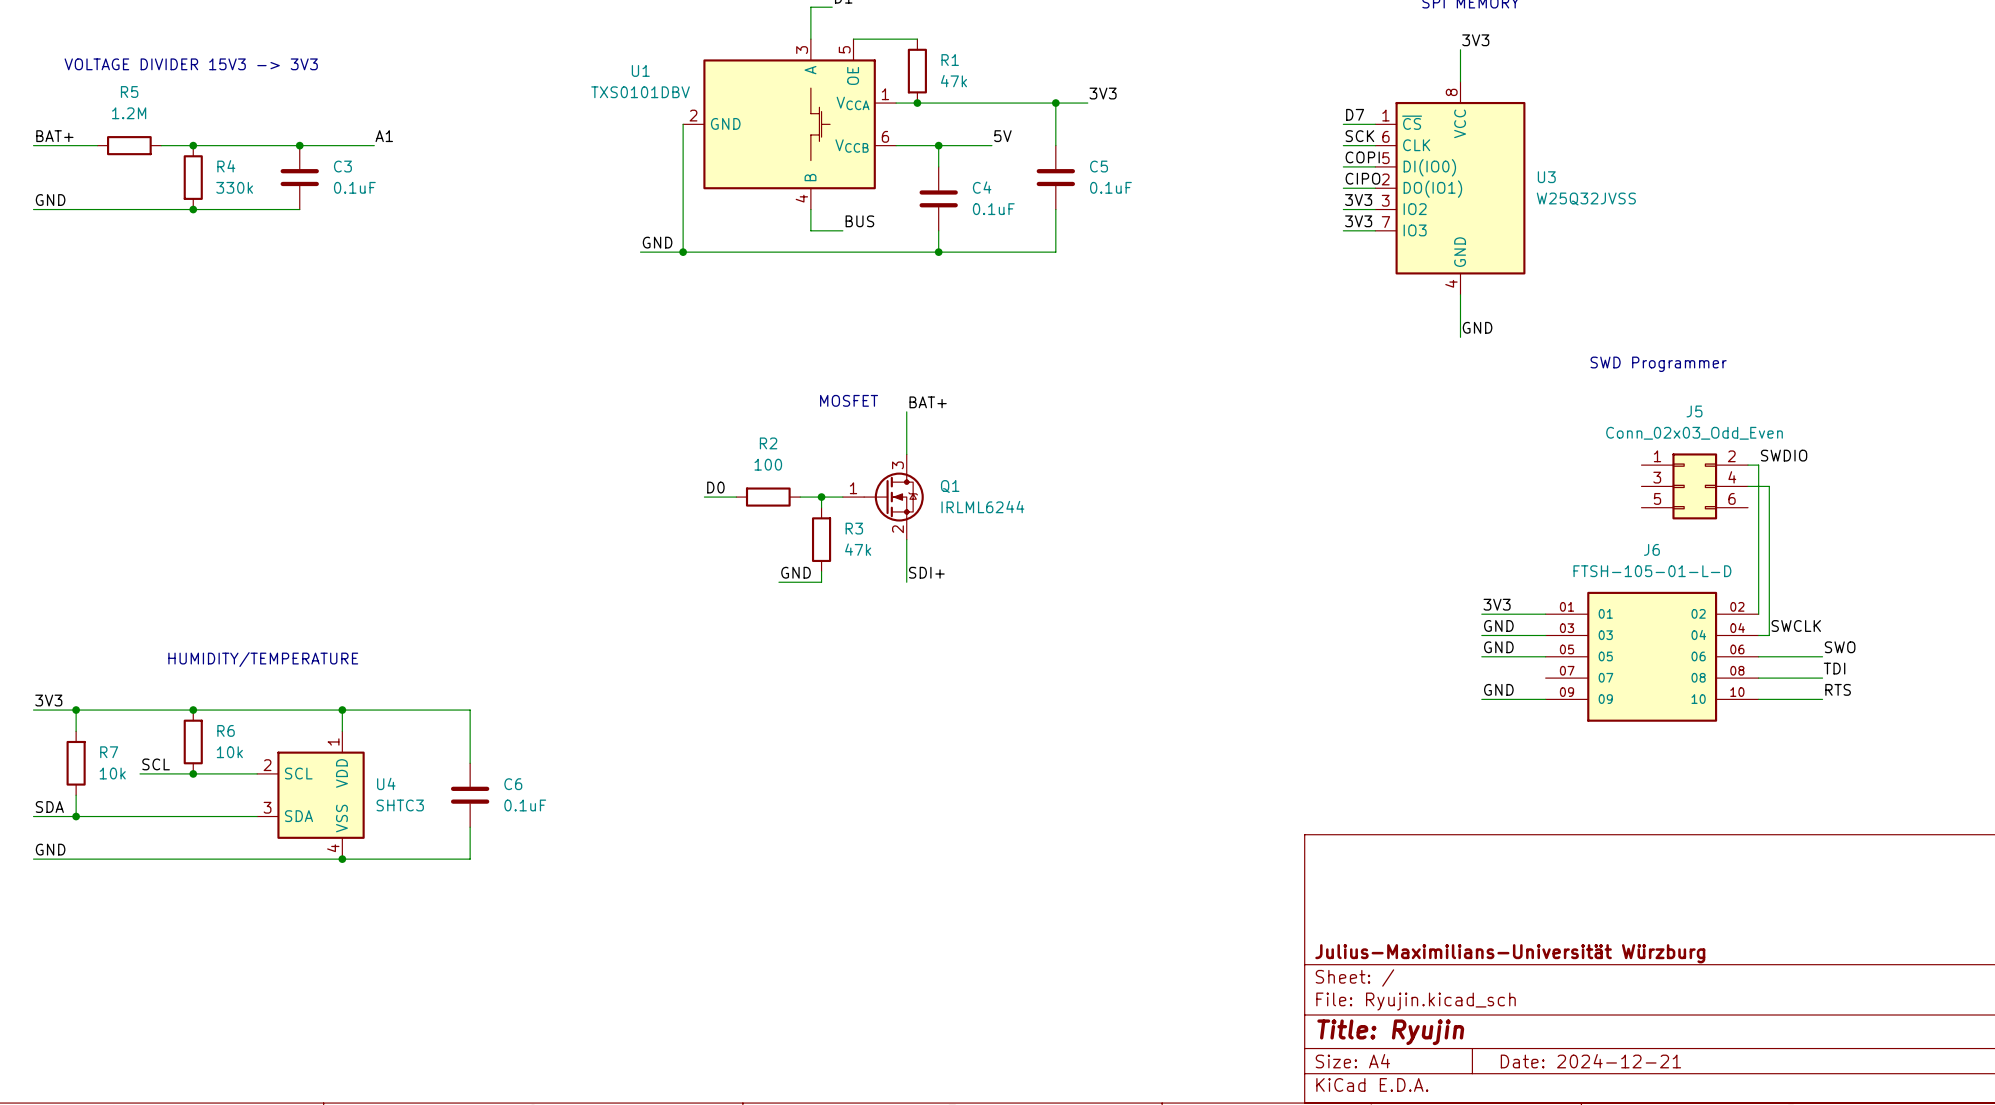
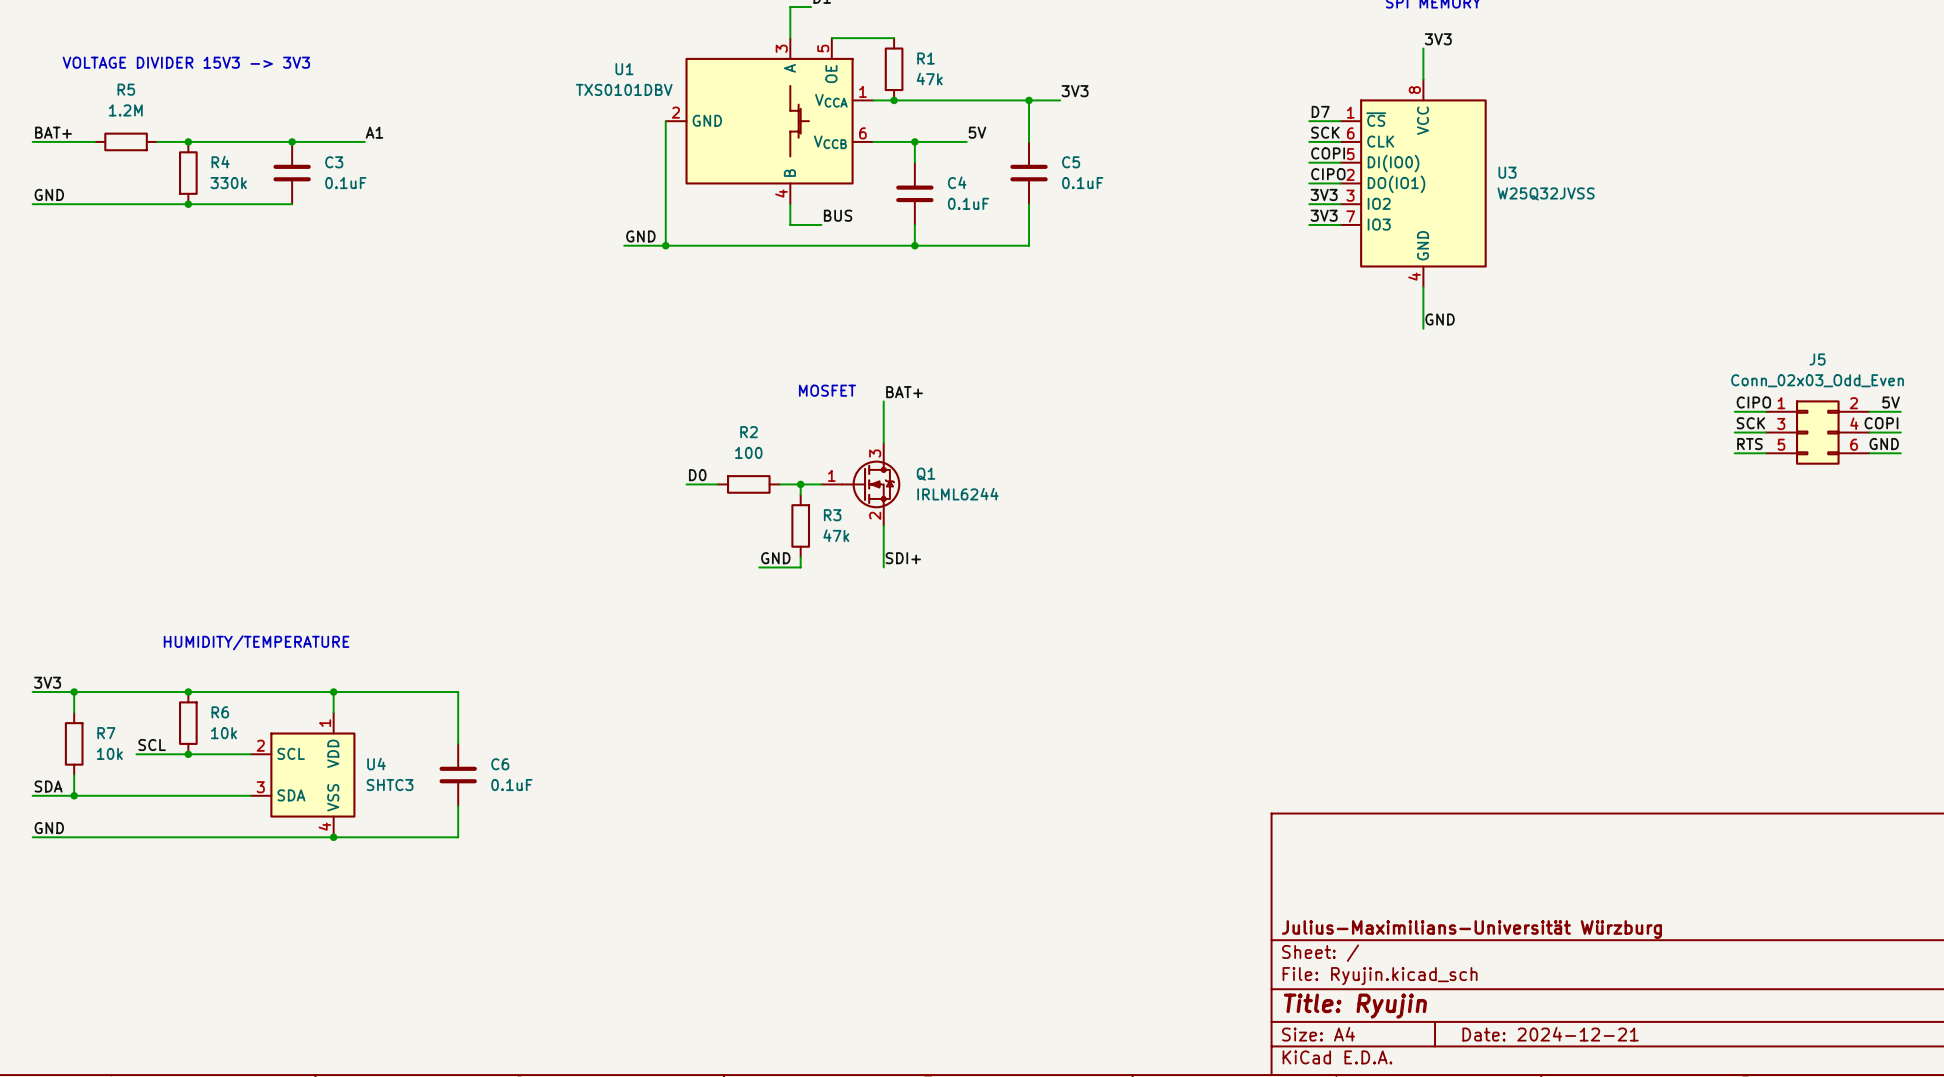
text: SWD Programmer (1658, 364) -> none
label: none -> CIPO (1753, 402)
label: none -> 5V (1891, 402)
wire: none -> (1734, 411) (1765, 411)
wire: none -> (1869, 411) (1900, 411)
label: none -> SCK (1750, 423)
label: none -> COPI (1881, 423)
wire: none -> (1734, 432) (1765, 432)
wire: none -> (1869, 432) (1900, 432)
label: SWDIO (1784, 455) -> none
label: none -> RTS (1749, 444)
label: none -> GND (1884, 444)
wire: (1748, 465) (1758, 465) (1758, 614) -> none
wire: none -> (1734, 453) (1765, 453)
wire: none -> (1869, 453) (1900, 453)
J5 position: (1694, 486) -> (1817, 432)
wire: (1748, 486) (1769, 486) (1769, 635) (1758, 635) -> none
label: 3V3 (1497, 604) -> none
wire: (1481, 614) (1545, 614) -> none
label: GND (1498, 625) -> none
label: SWCLK (1796, 625) -> none
wire: (1481, 635) (1545, 635) -> none
label: GND (1498, 647) -> none
label: SWO (1840, 647) -> none
wire: (1481, 656) (1545, 656) -> none
J6: FTSH-105-01-L-D (1652, 656) -> none
wire: (1758, 656) (1822, 656) -> none
label: TDI (1834, 668) -> none
wire: (1758, 678) (1822, 678) -> none
label: GND (1498, 689) -> none
label: RTS (1838, 689) -> none
wire: (1481, 699) (1545, 699) -> none
wire: (1758, 699) (1822, 699) -> none

